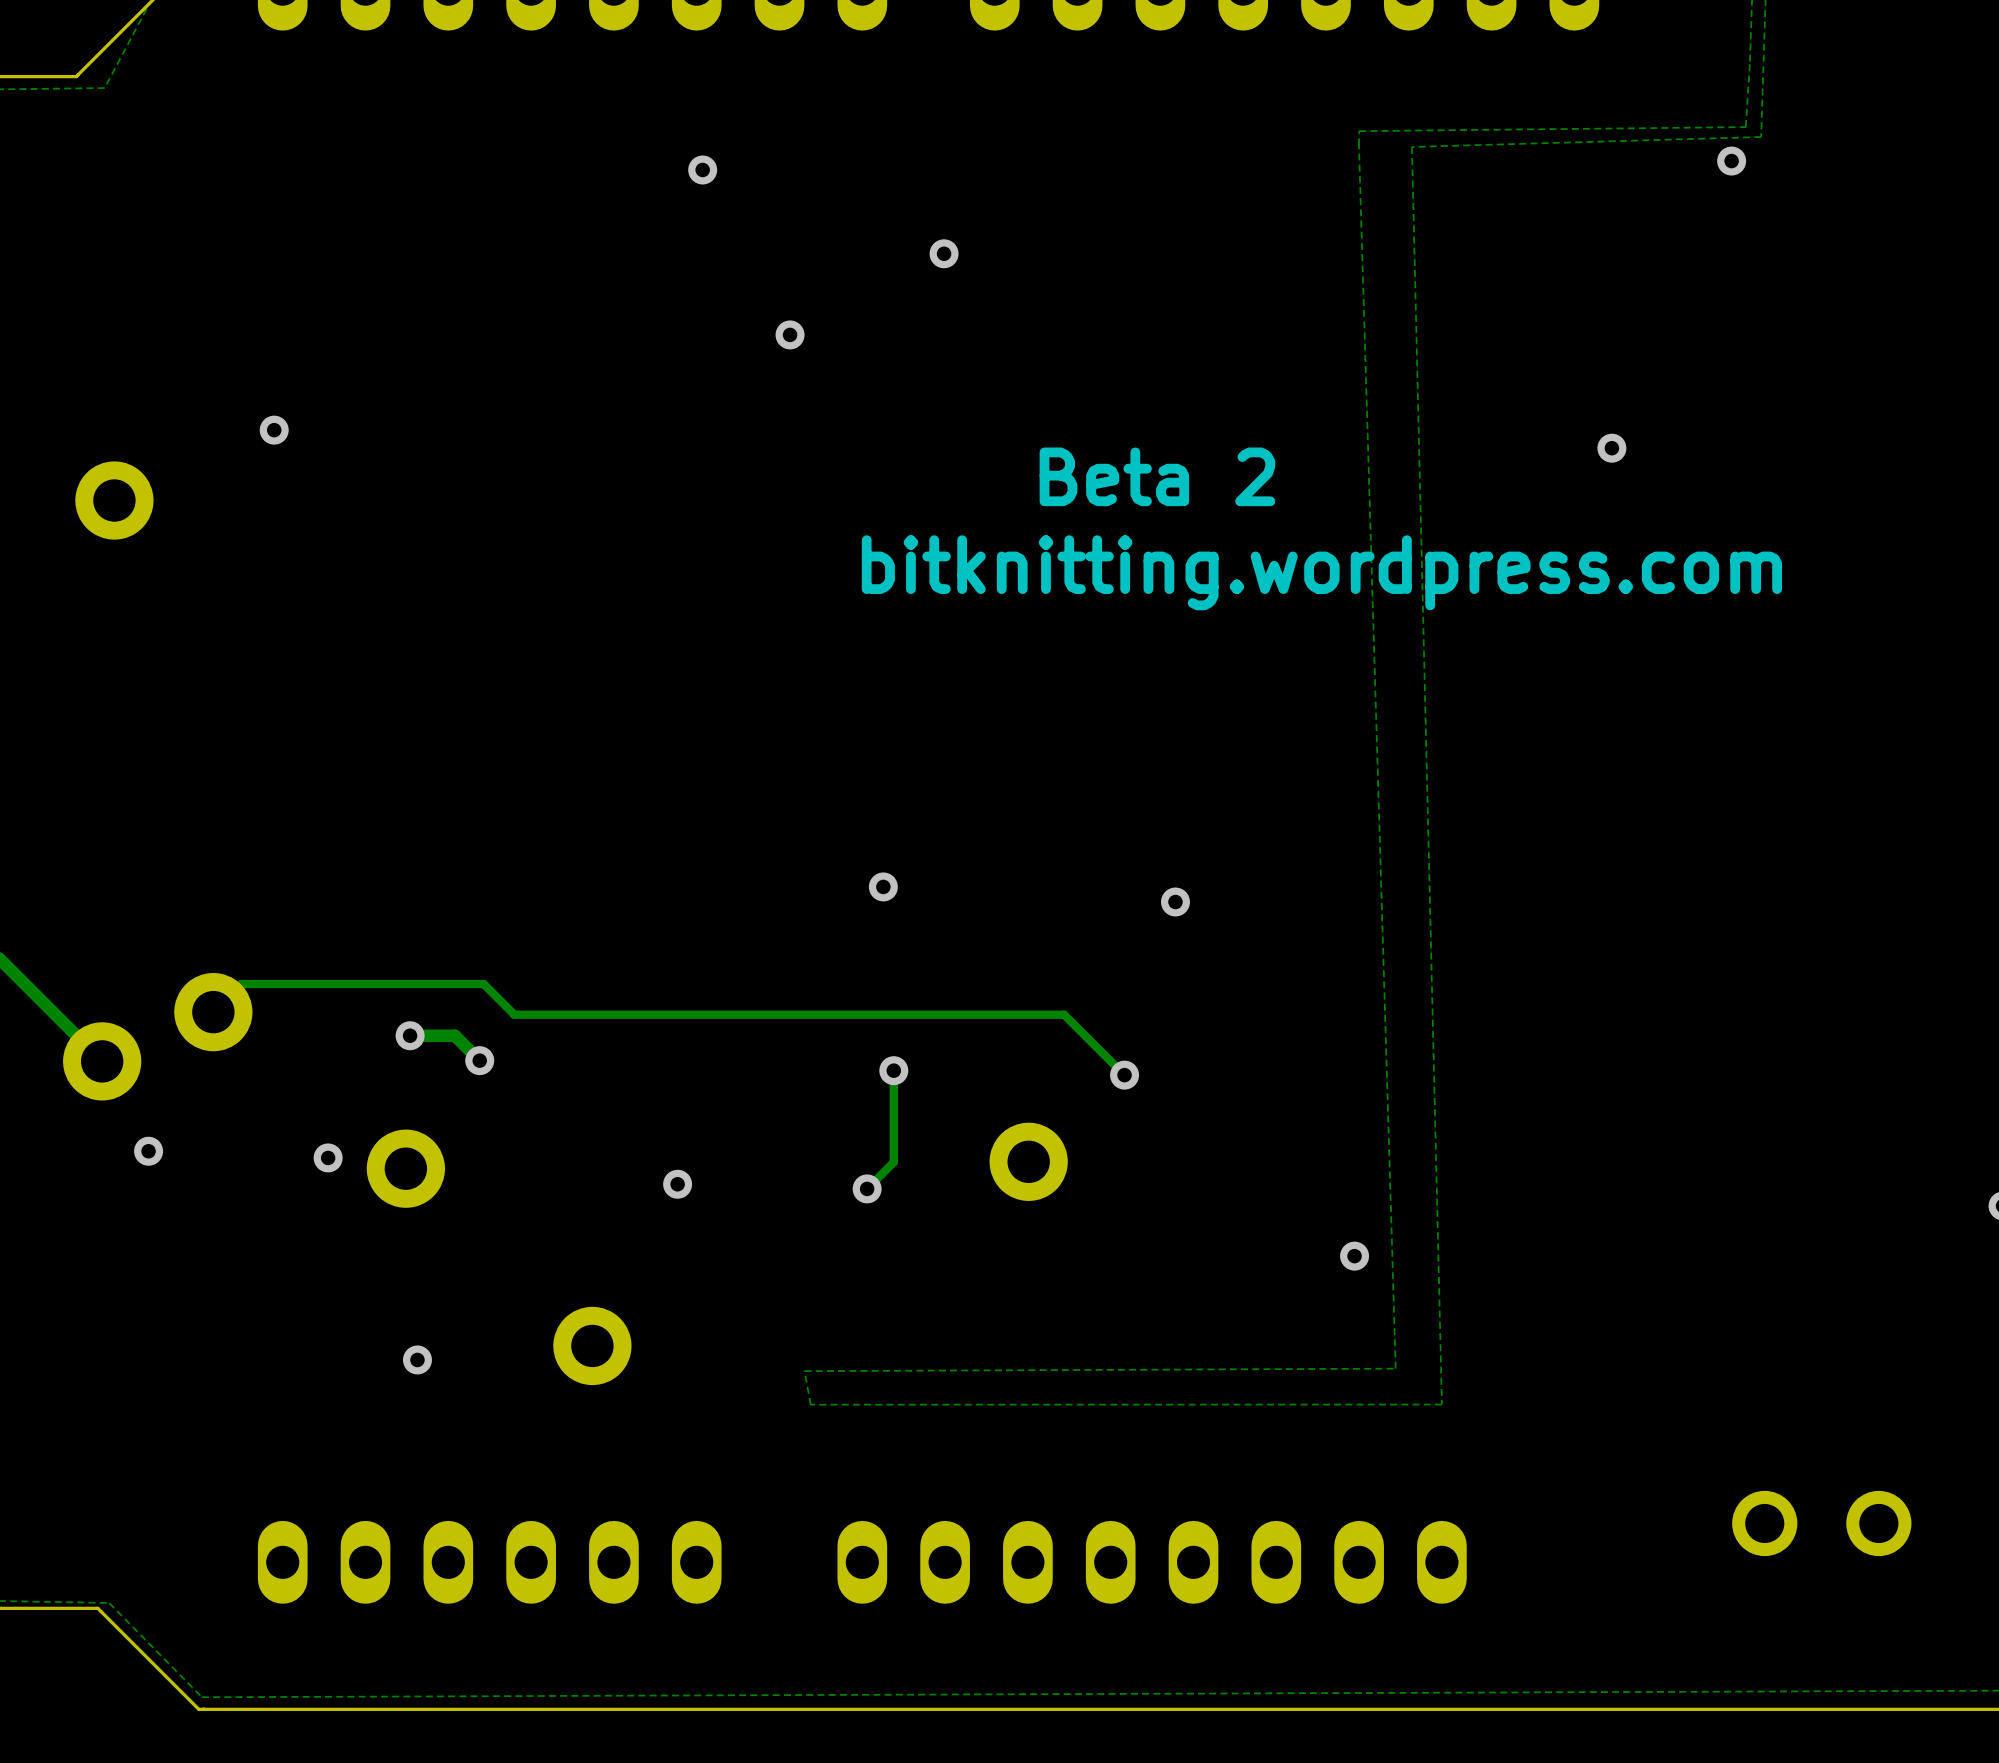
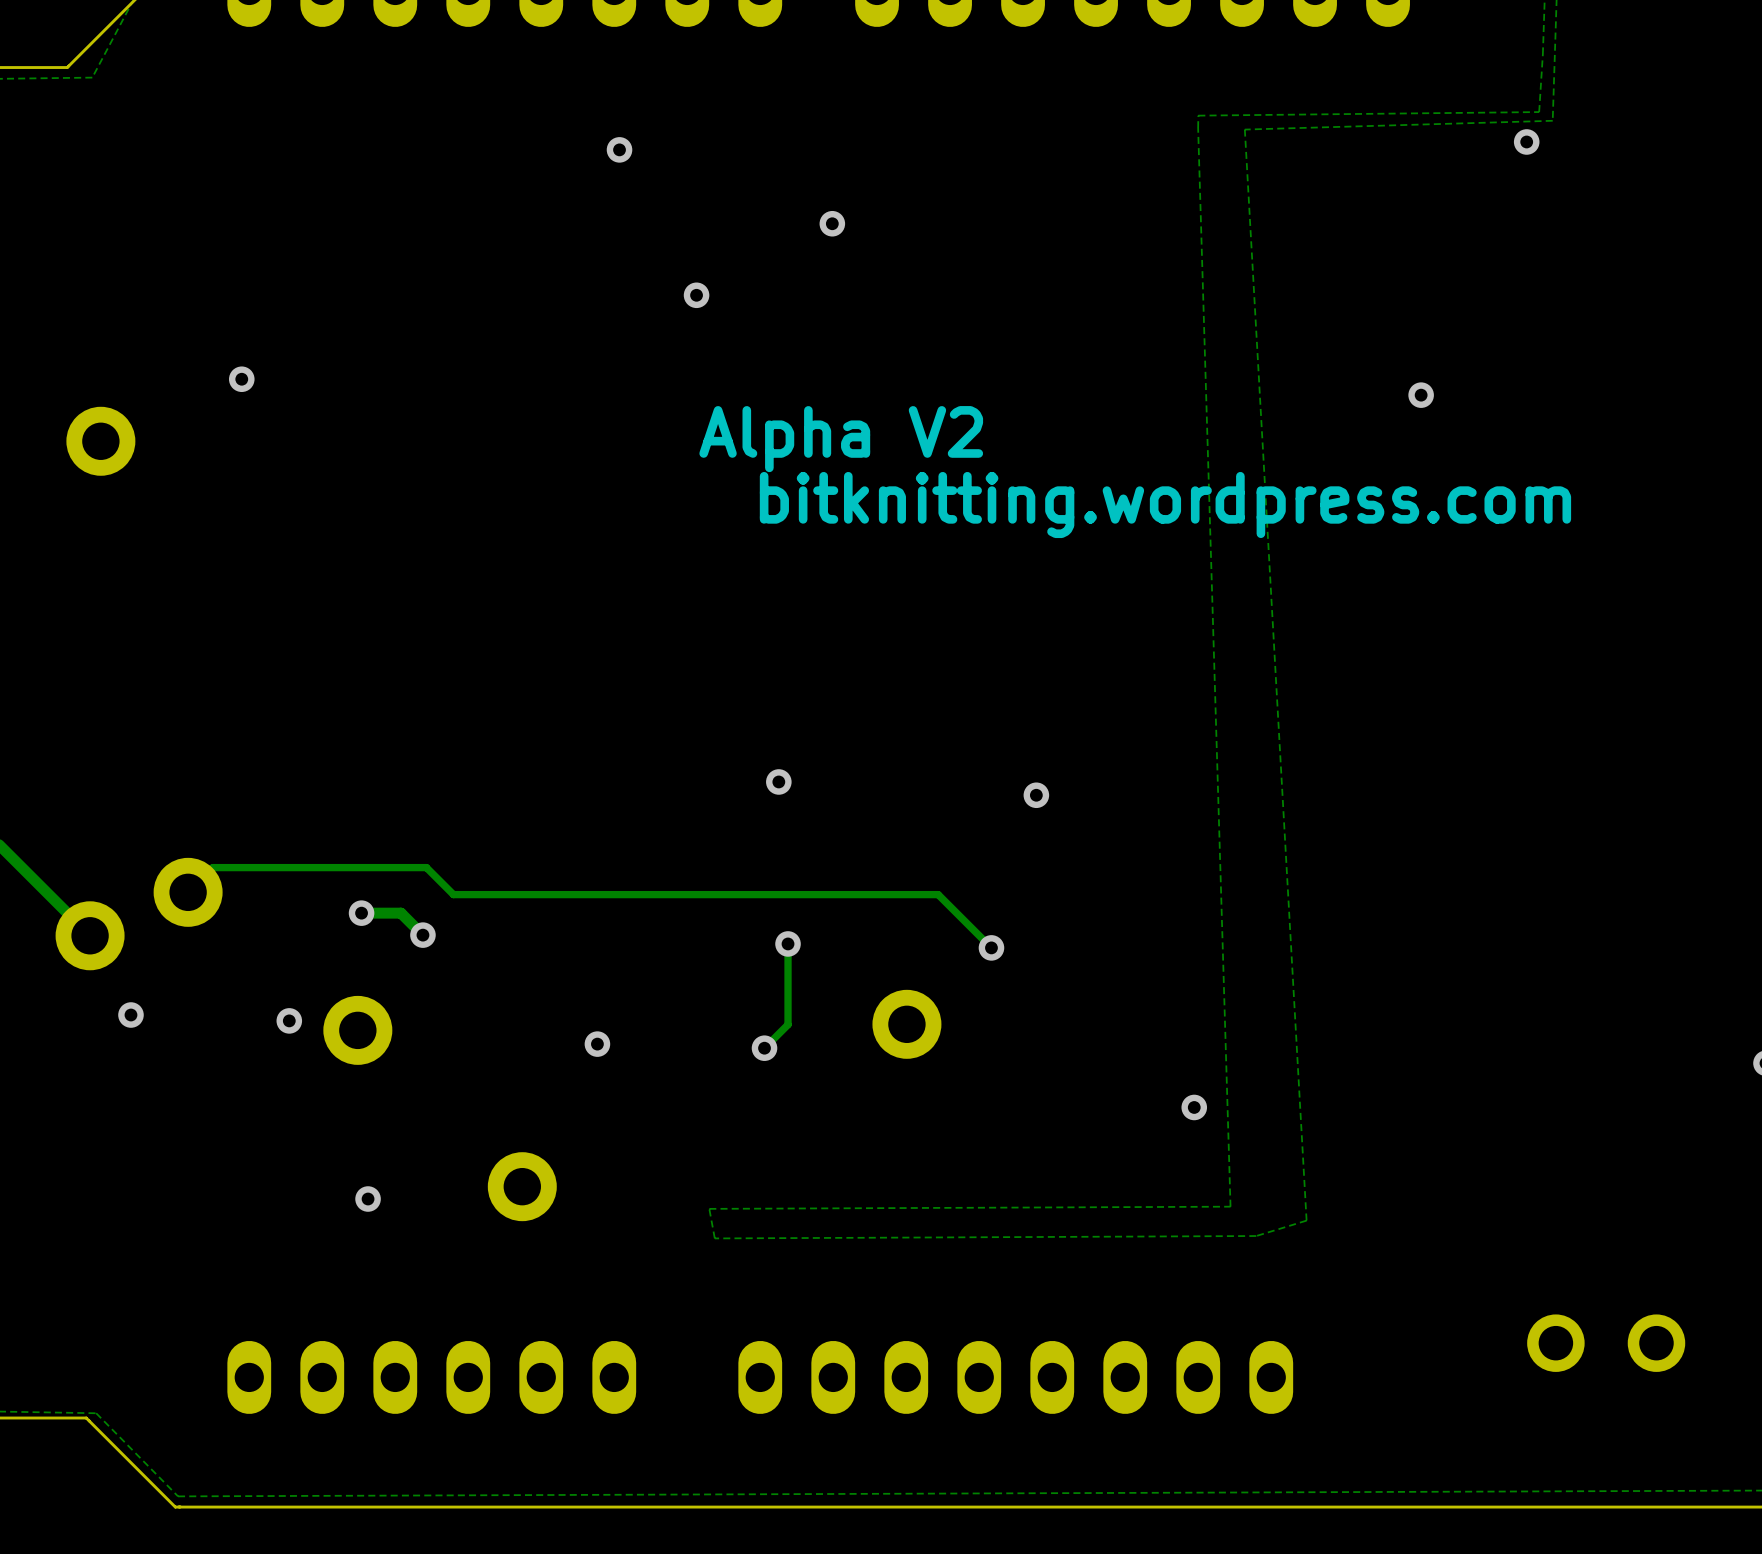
zone outline: (1411, 146) (1441, 1404) (810, 1404) -> (1244, 129) (1306, 1220) (1256, 1236) (714, 1238)
text: Beta 2 (1157, 476) -> none
text: none -> Alpha V2 (841, 439)

